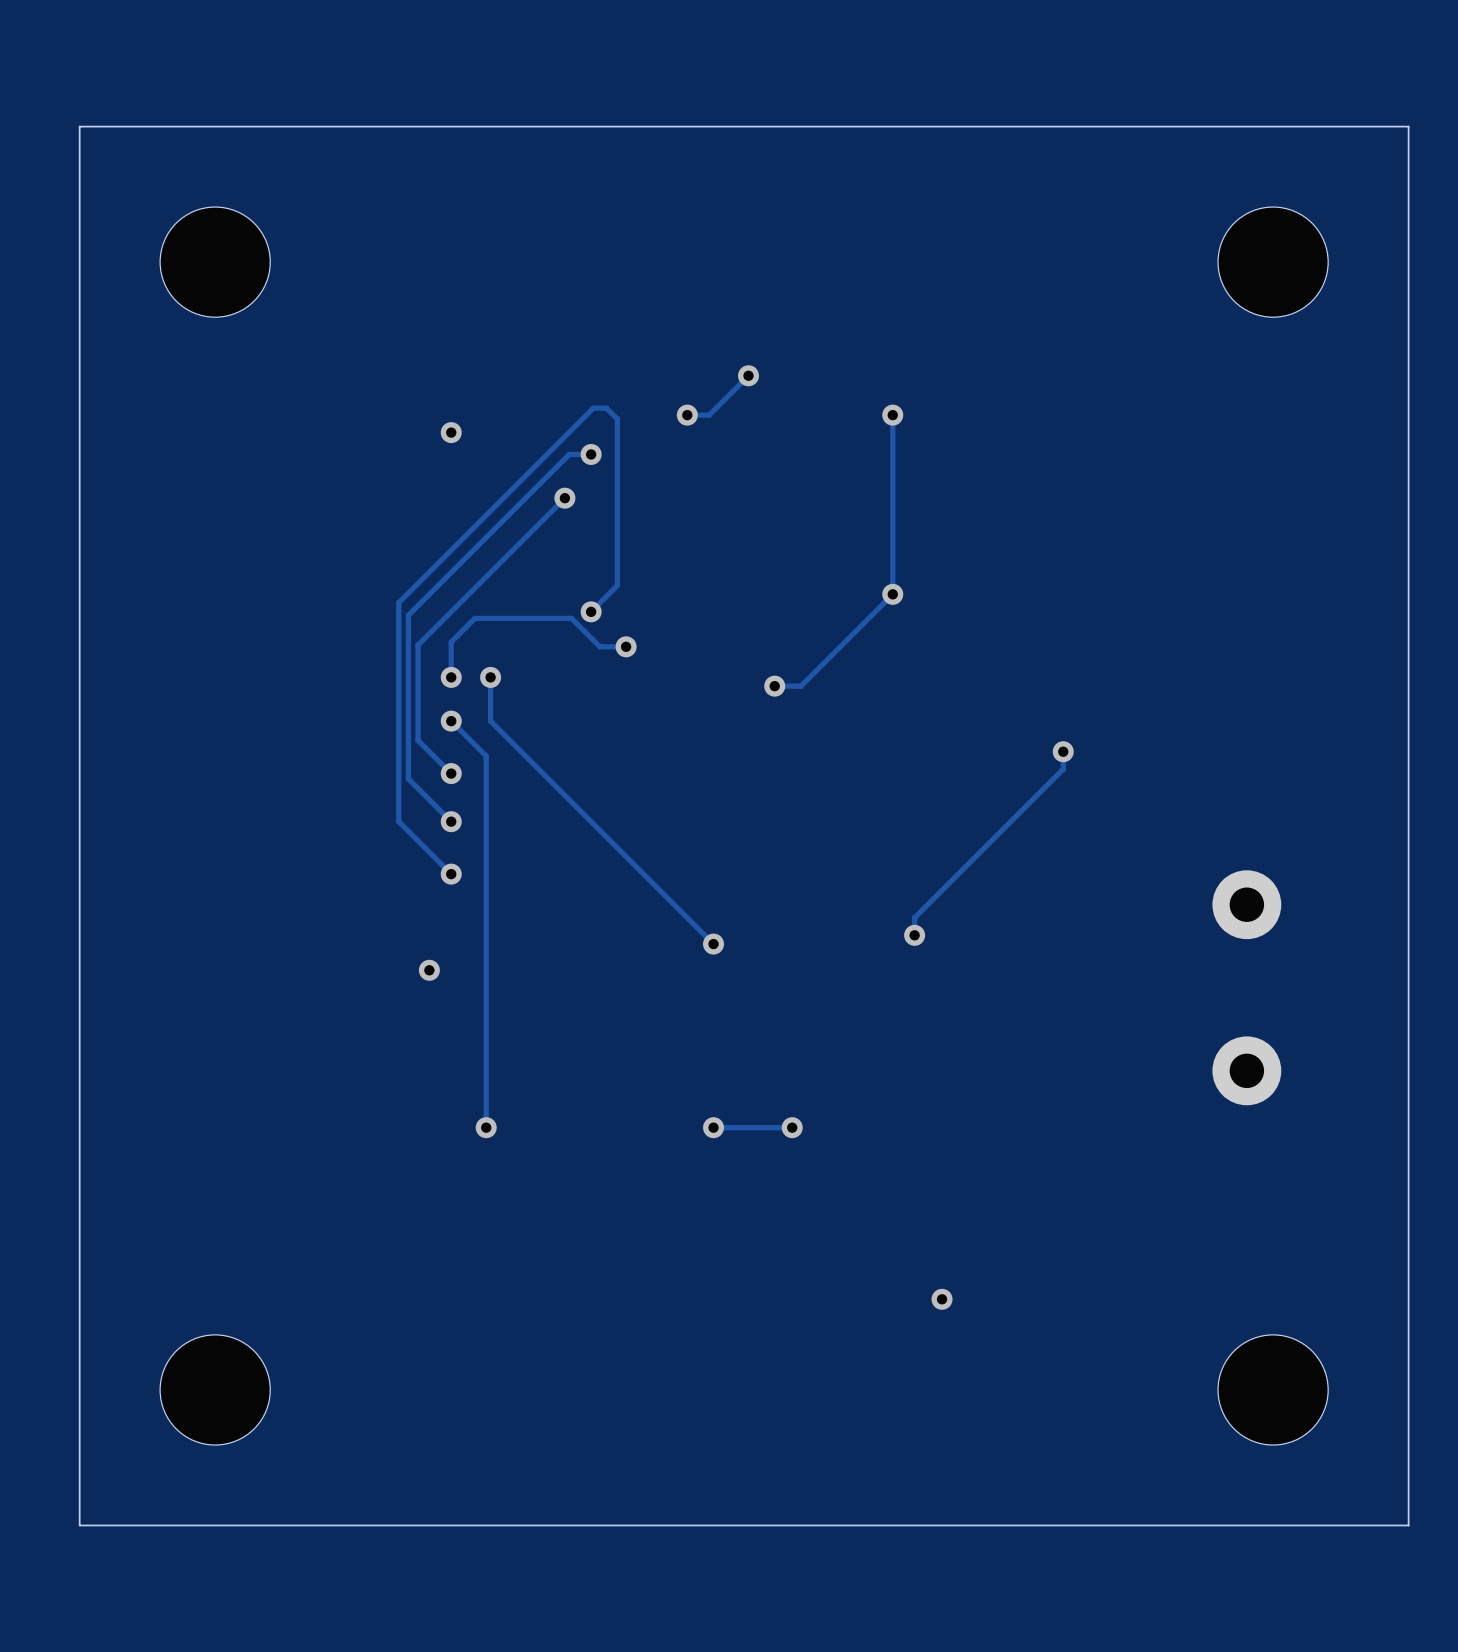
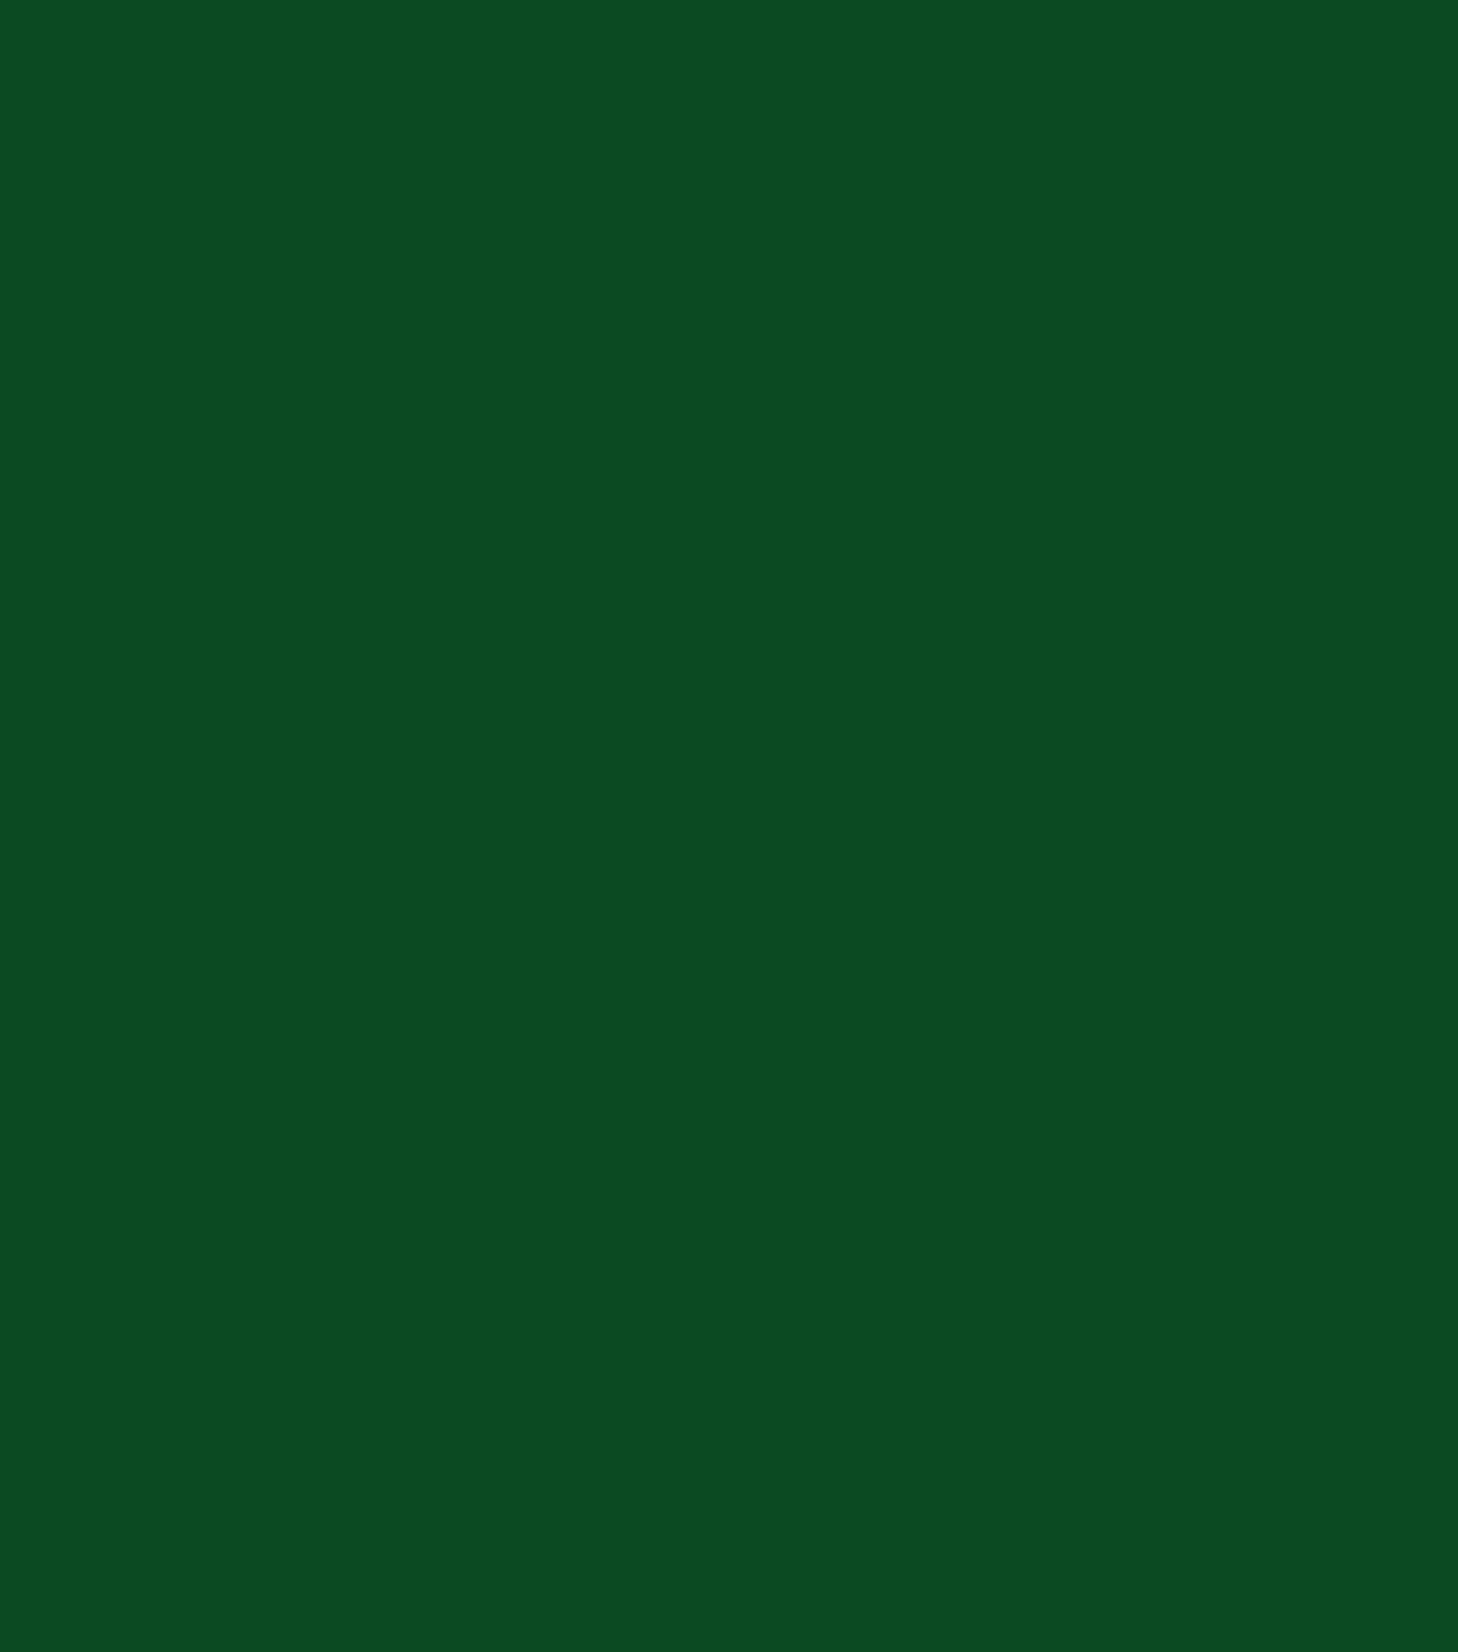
board edge: (1408, 126) (79, 126) (79, 1525) (1408, 1525) (1408, 126) -> none
part: (215, 262) -> none
part: (1273, 262) -> none
track: (748, 375) (709, 415) (687, 415) -> none
via: (748, 375) -> none
via: (687, 415) -> none
track: (892, 415) (892, 594) (800, 686) (774, 686) -> none
via: (892, 415) -> none
via: (451, 432) -> none
track: (591, 454) (569, 454) (408, 615) (408, 778) (451, 821) -> none
via: (591, 454) -> none
track: (564, 498) (418, 645) (418, 740) (451, 773) -> none
via: (564, 498) -> none
via: (892, 594) -> none
track: (591, 611) (617, 585) (617, 419) (606, 408) (593, 408) (398, 602) (398, 821) (451, 874) -> none
via: (591, 611) -> none
track: (626, 646) (599, 646) (571, 618) (474, 618) (451, 642) (451, 677) -> none
via: (626, 646) -> none
via: (451, 677) -> none
track: (490, 677) (490, 721) (713, 944) -> none
via: (490, 677) -> none
via: (774, 686) -> none
track: (451, 721) (486, 756) (486, 1127) -> none
via: (451, 721) -> none
track: (1063, 751) (1063, 769) (914, 917) (914, 935) -> none
via: (1063, 751) -> none
via: (451, 773) -> none
via: (451, 821) -> none
via: (451, 874) -> none
part: (1246, 904) -> none
via: (914, 935) -> none
via: (713, 944) -> none
via: (429, 970) -> none
part: (1246, 1070) -> none
via: (486, 1127) -> none
via: (713, 1127) -> none
track: (792, 1127) (713, 1127) -> none
via: (792, 1127) -> none
via: (942, 1299) -> none
part: (215, 1389) -> none
part: (1273, 1389) -> none

